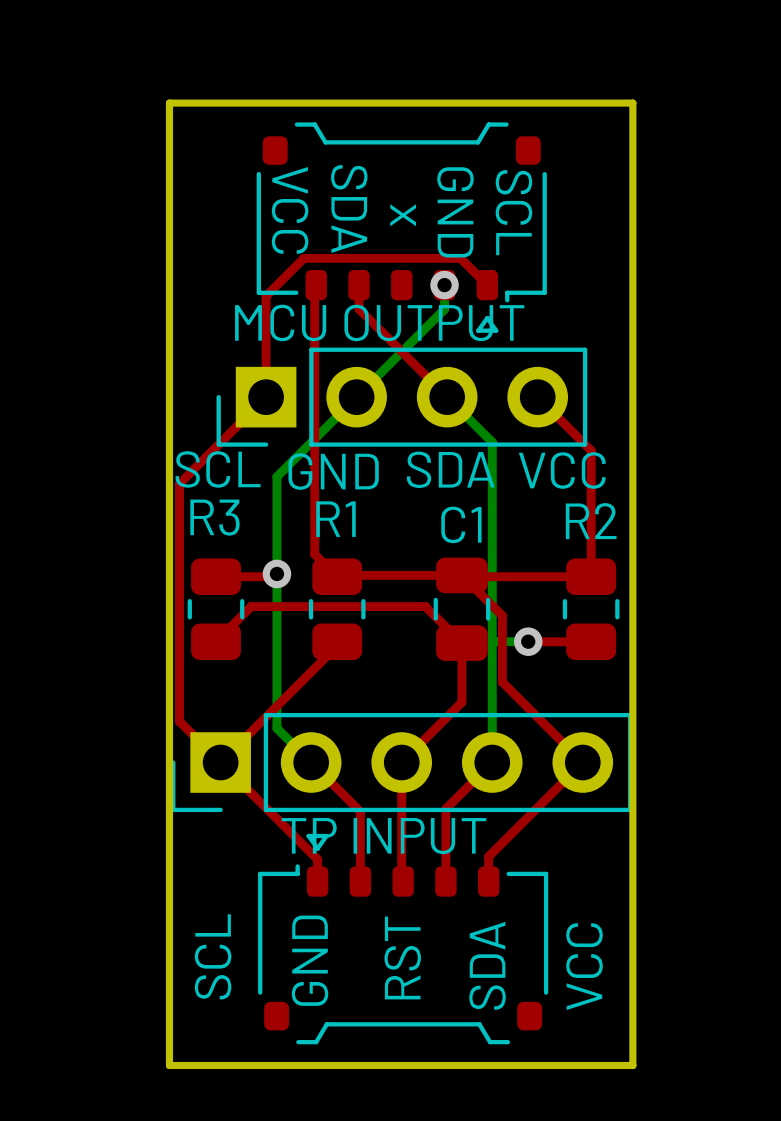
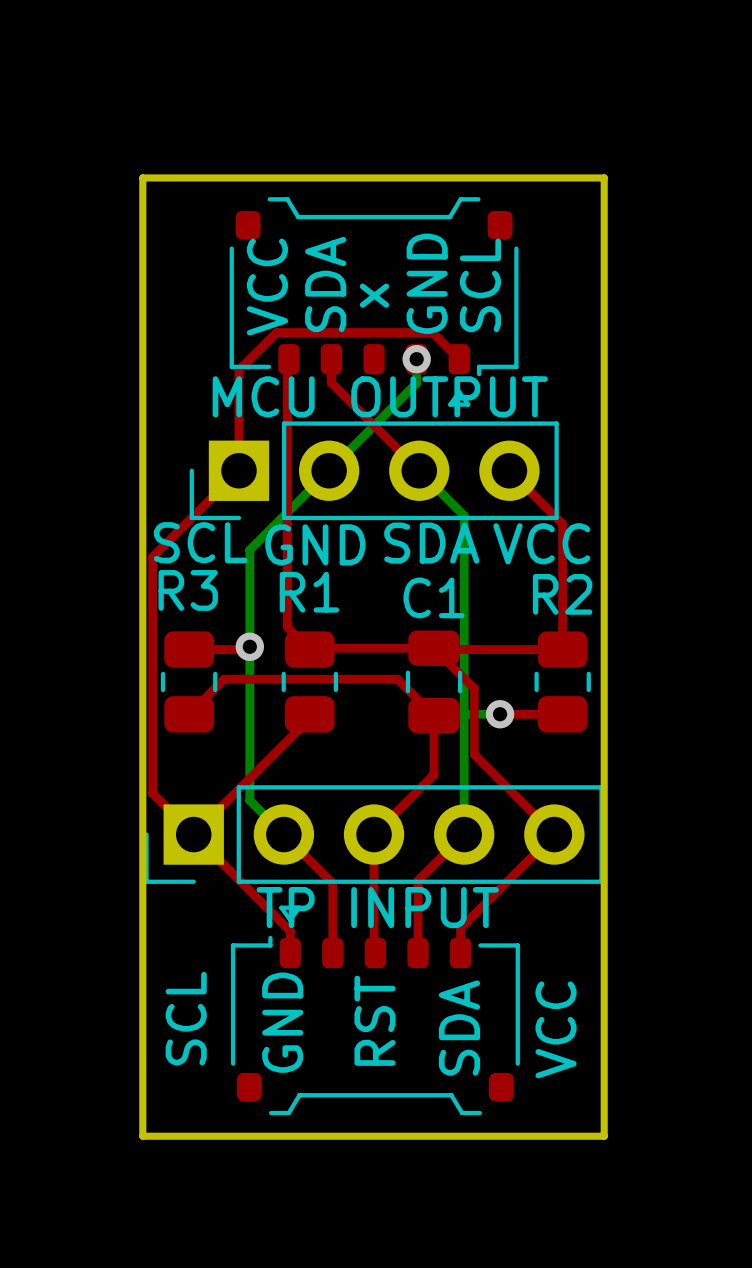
text rotation: 0° (349, 208) -> 180° (325, 284)
text rotation: 0° (290, 210) -> 180° (267, 287)
text rotation: 0° (455, 212) -> 180° (427, 283)
text rotation: 0° (513, 212) -> 180° (480, 285)

